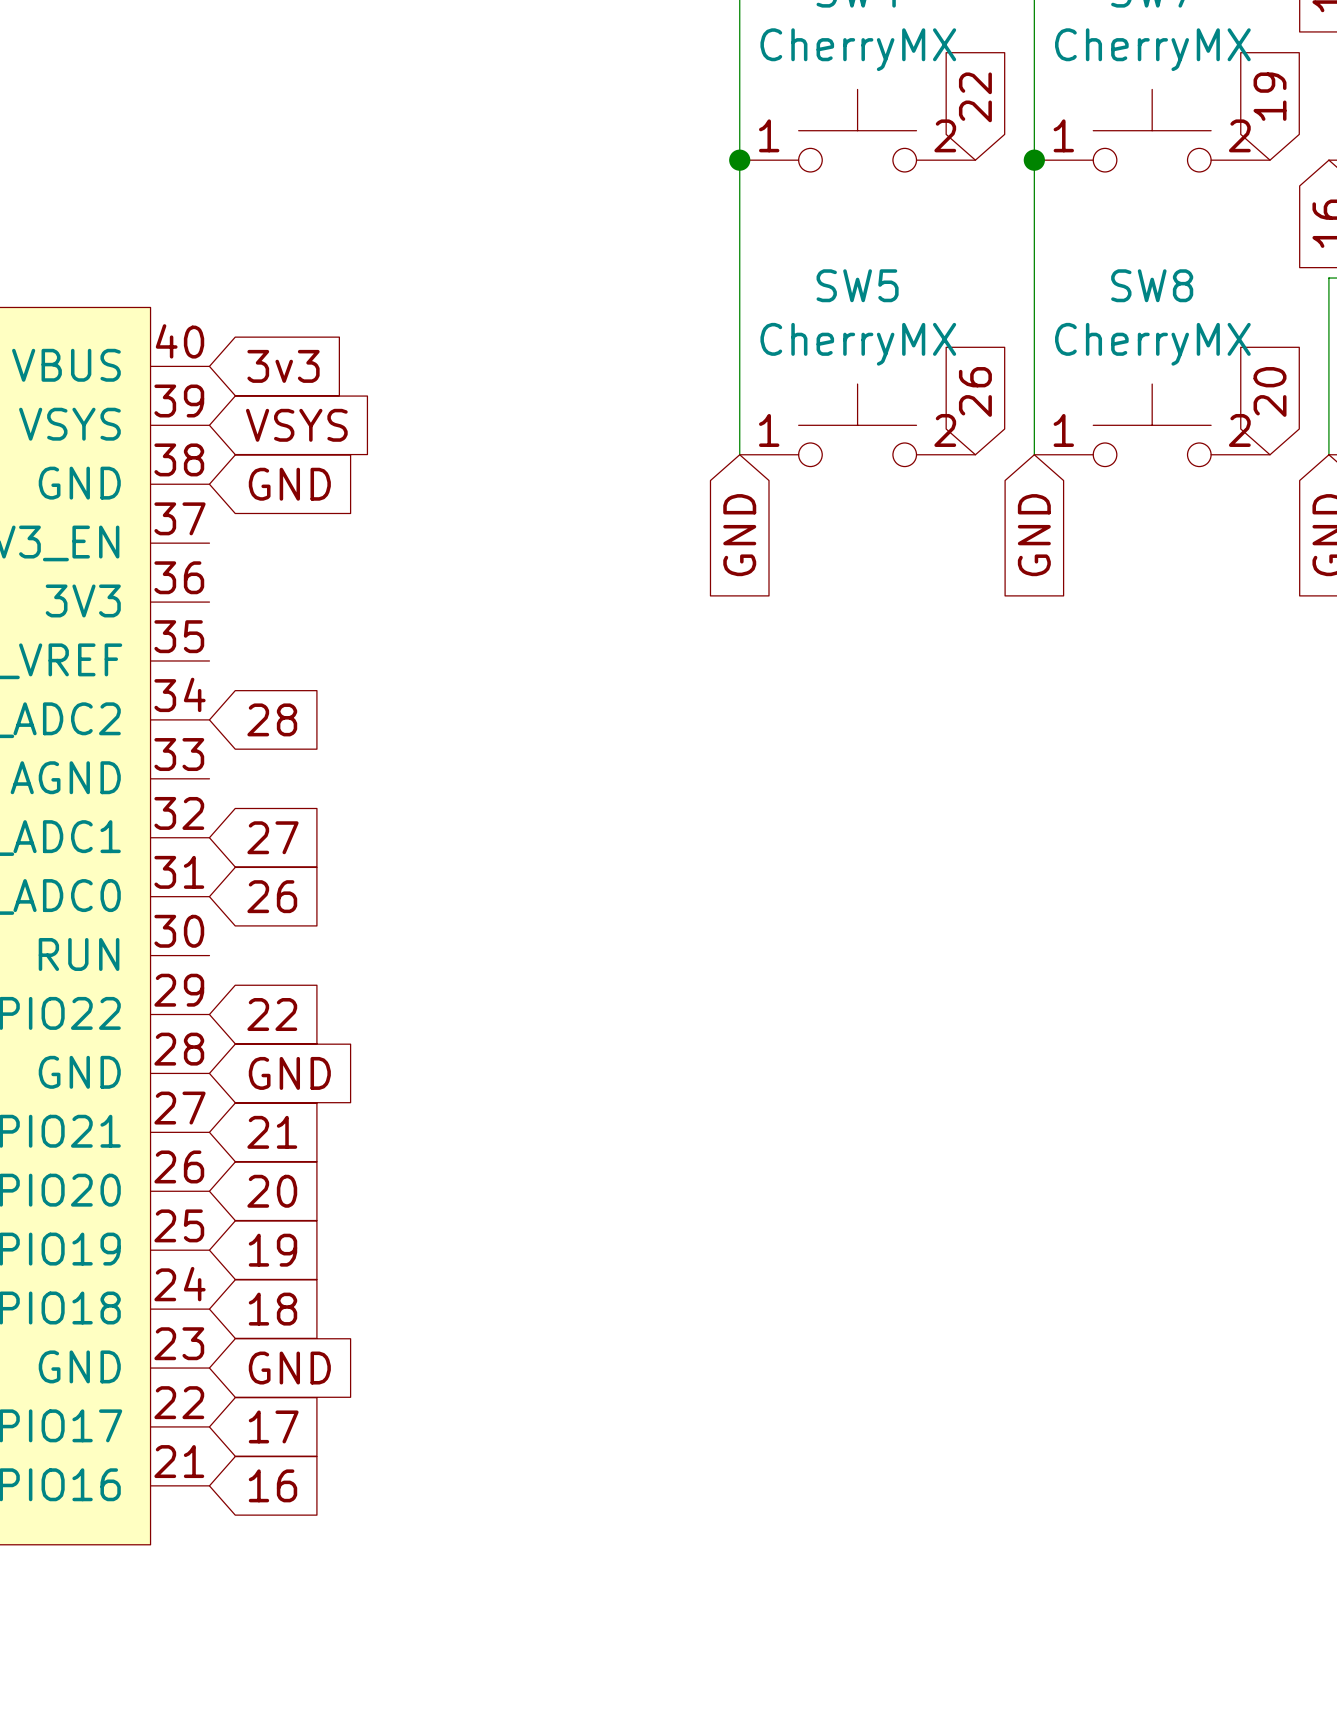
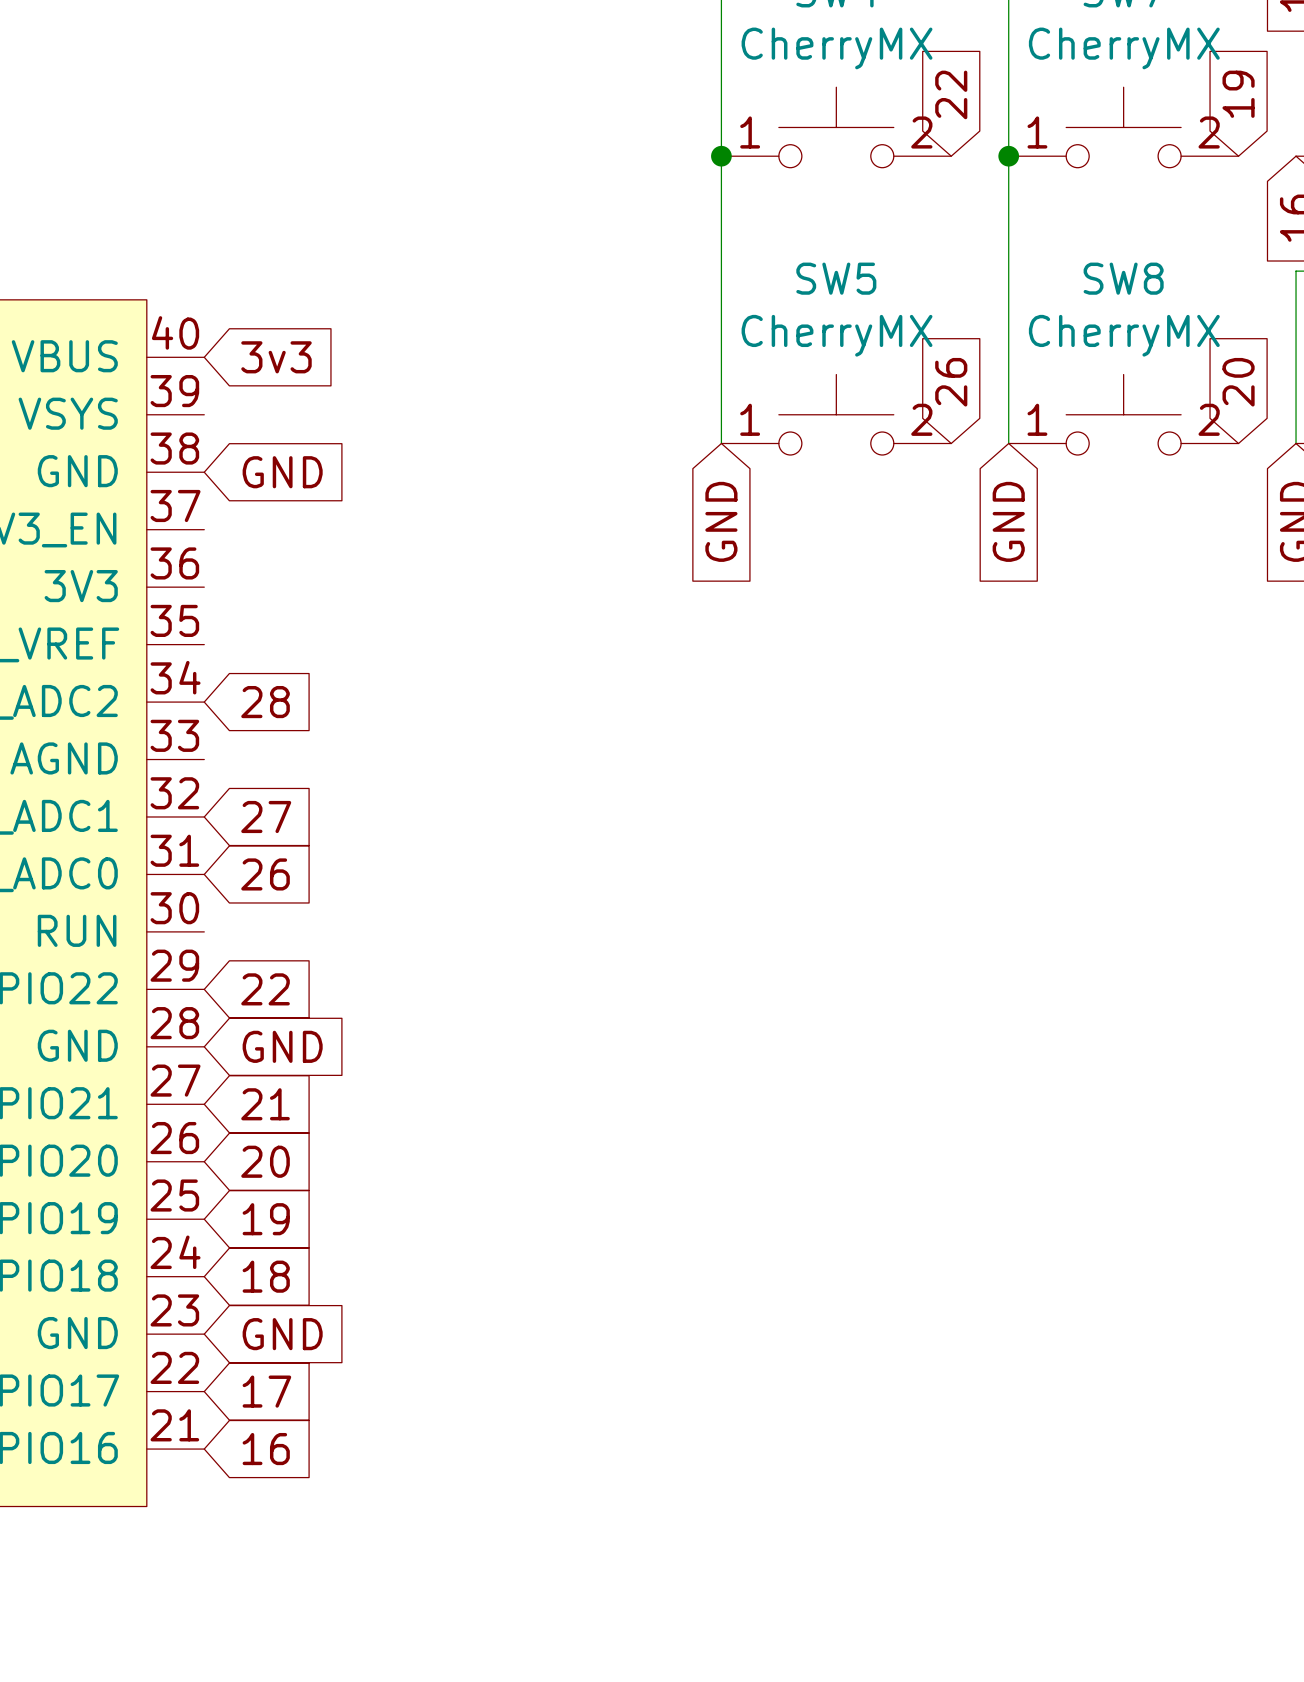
global label: VSYS (296, 425) -> none

